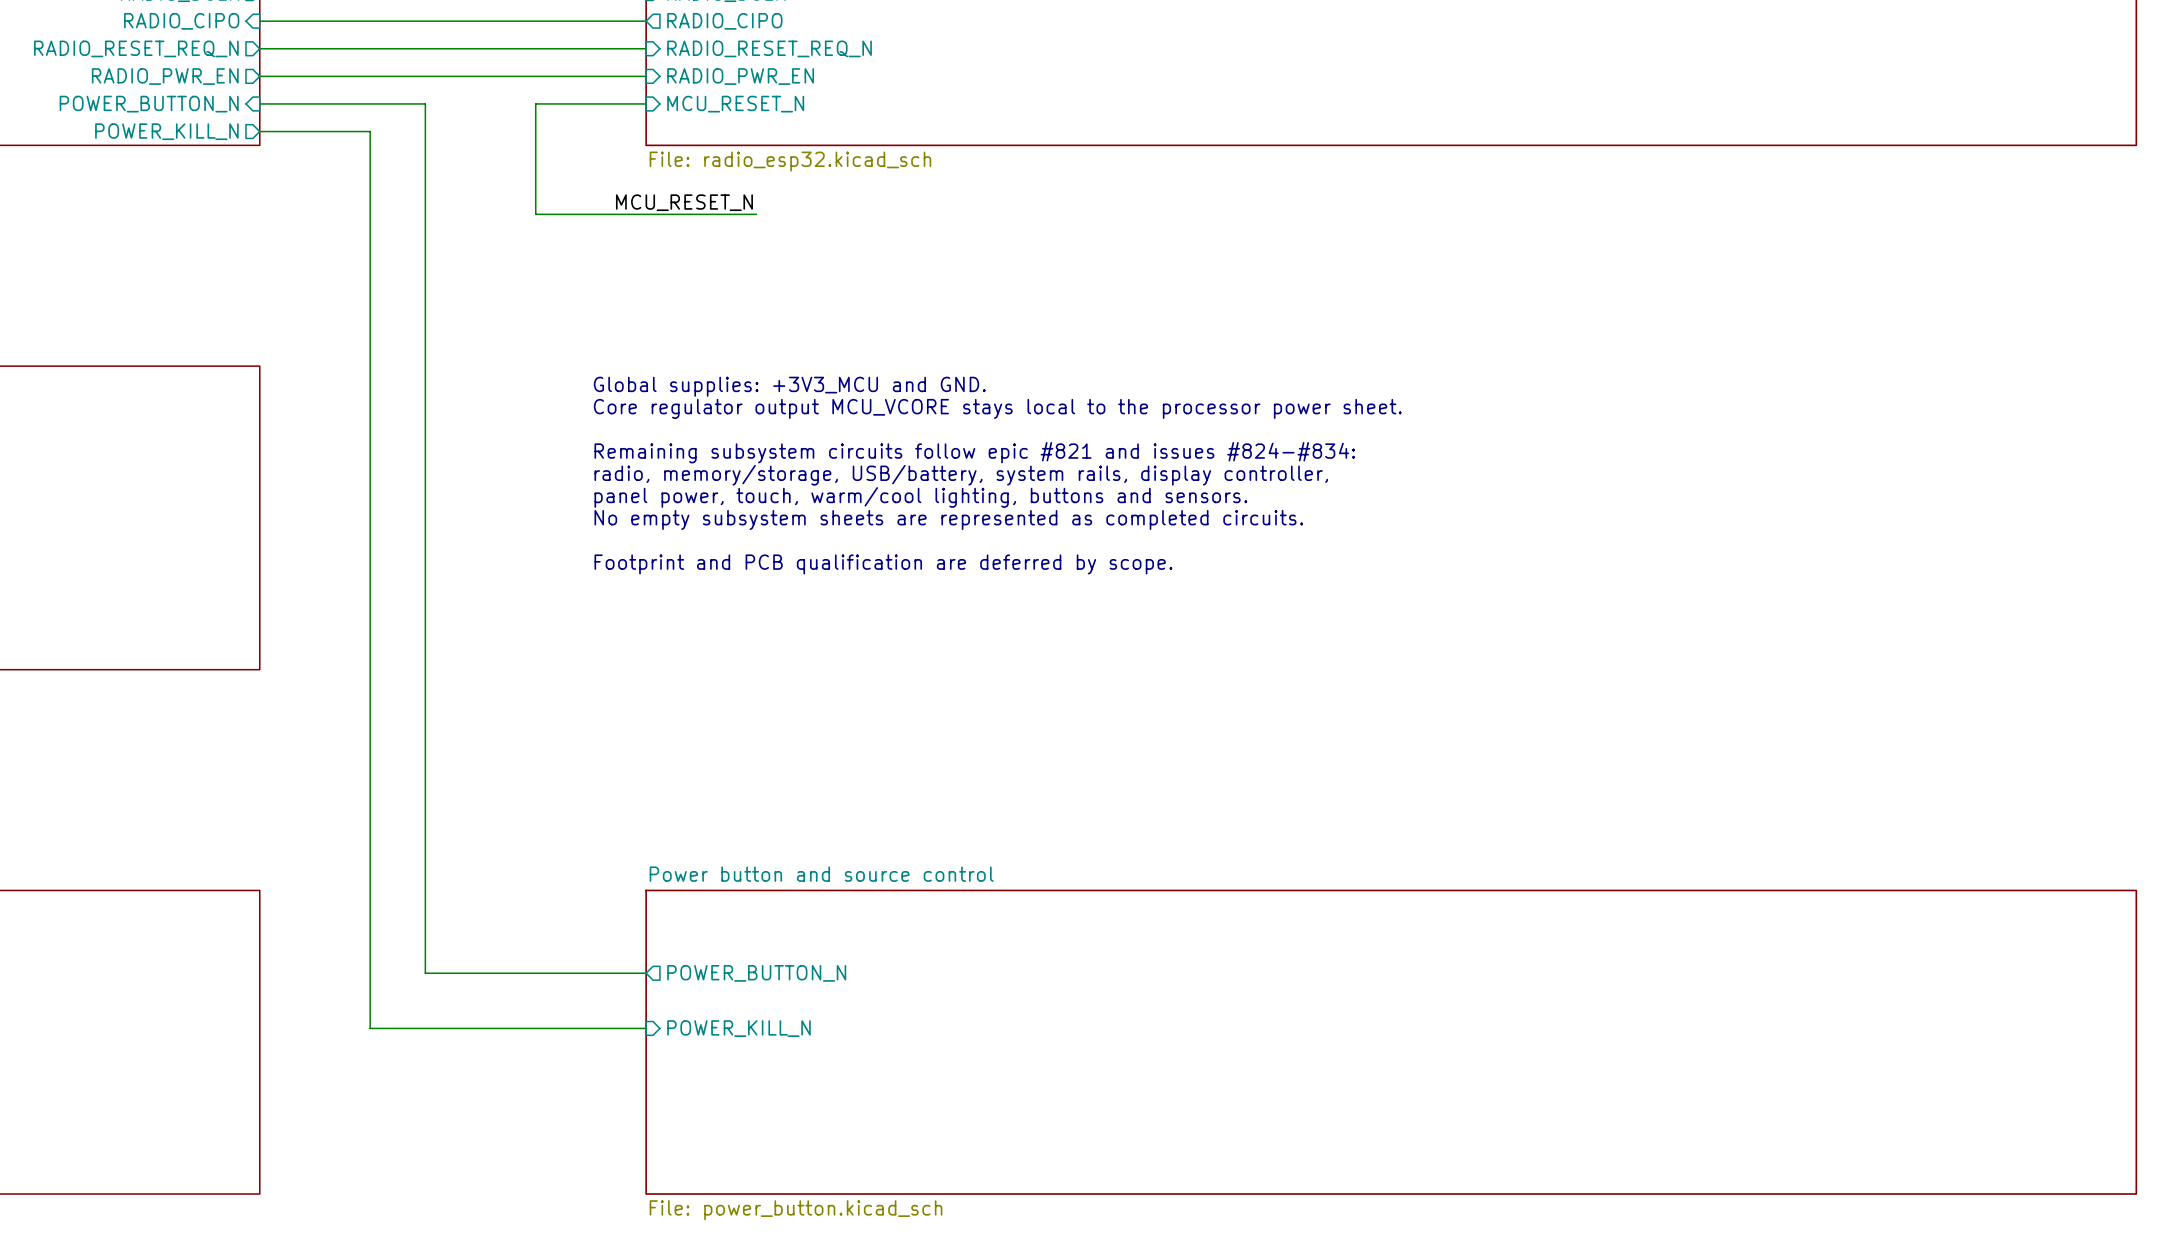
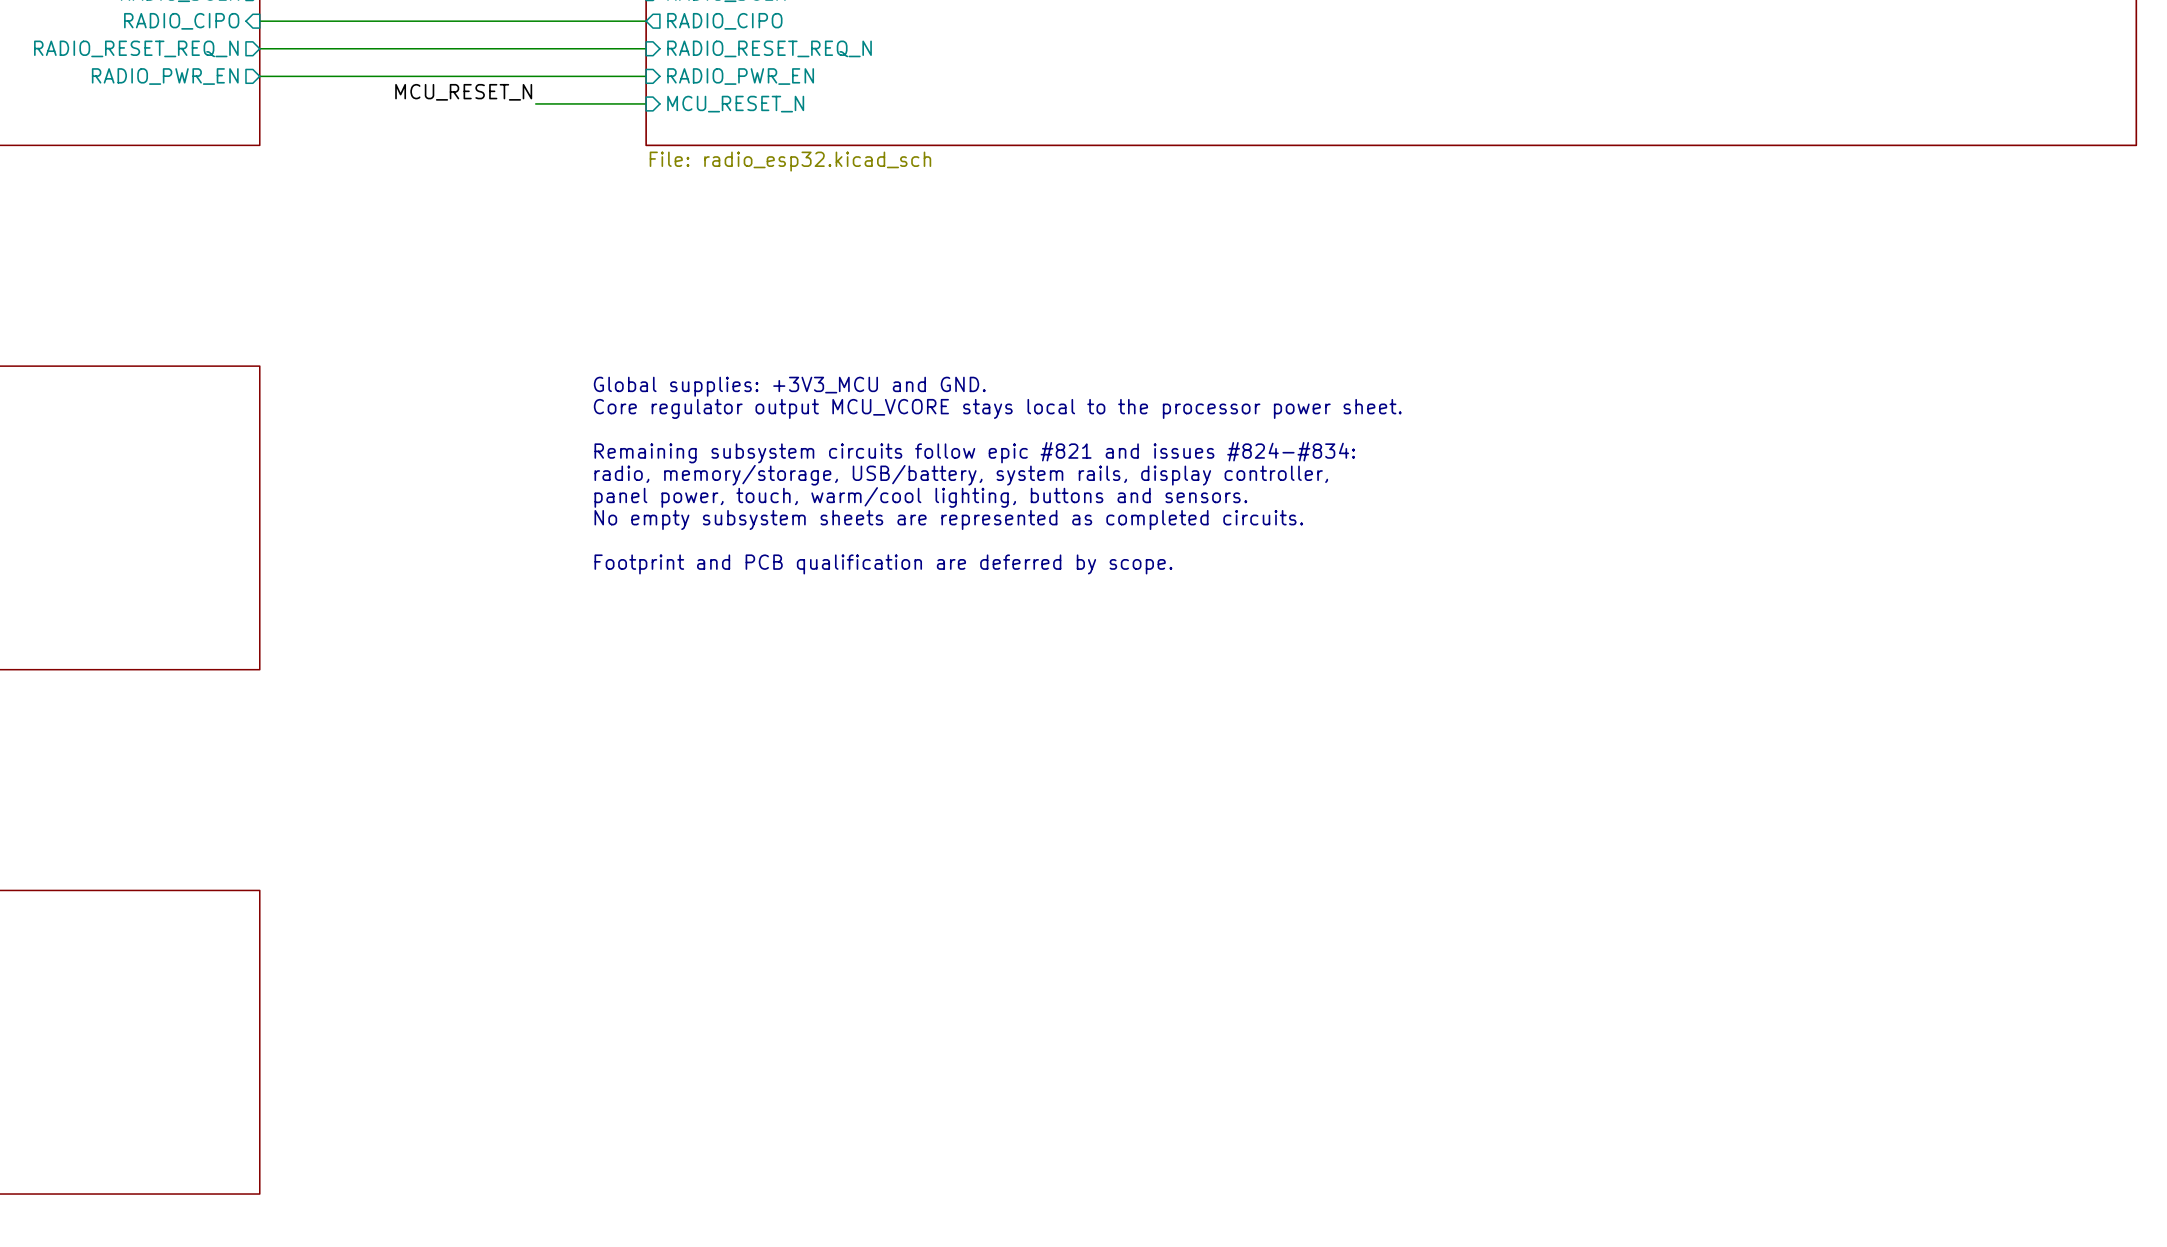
wire: (259, 103) (425, 103) (425, 973) (646, 973) -> none
wire: (535, 103) (535, 214) (756, 214) -> none
sheet pin: POWER_BUTTON_N (149, 104) -> none
sheet pin: POWER_KILL_N (166, 131) -> none
wire: (259, 131) (370, 131) (370, 1028) (646, 1028) -> none
label position: MCU_RESET_N (684, 202) -> MCU_RESET_N (463, 92)
sheet pin: POWER_BUTTON_N (756, 973) -> none
sheet pin: POWER_KILL_N (738, 1028) -> none
sheet Power button and source control: File: power_button.kicad_sch (1391, 1042) -> none

